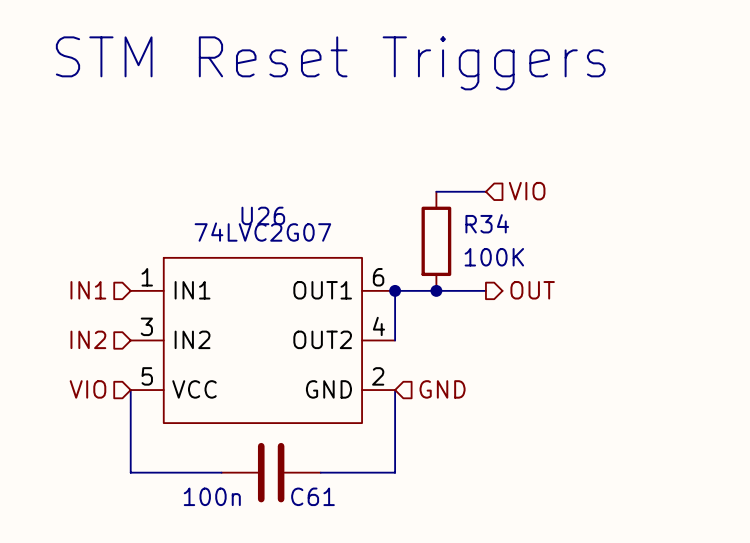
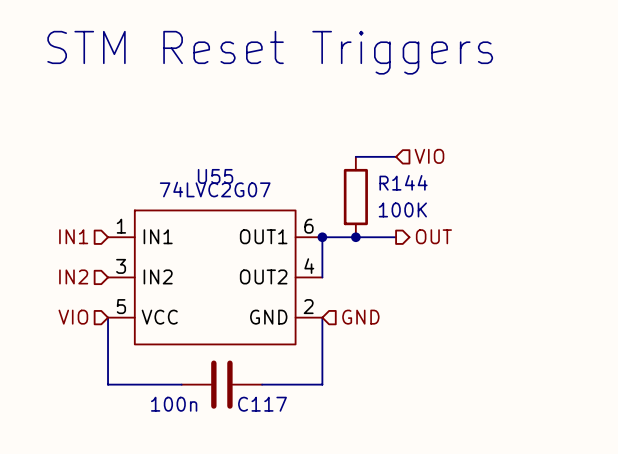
U26 name: U26 (263, 215) -> U55 (215, 176)
R34 name: R34 (487, 223) -> R144 (403, 182)
C61 name: C61 (312, 496) -> C117 (262, 404)

